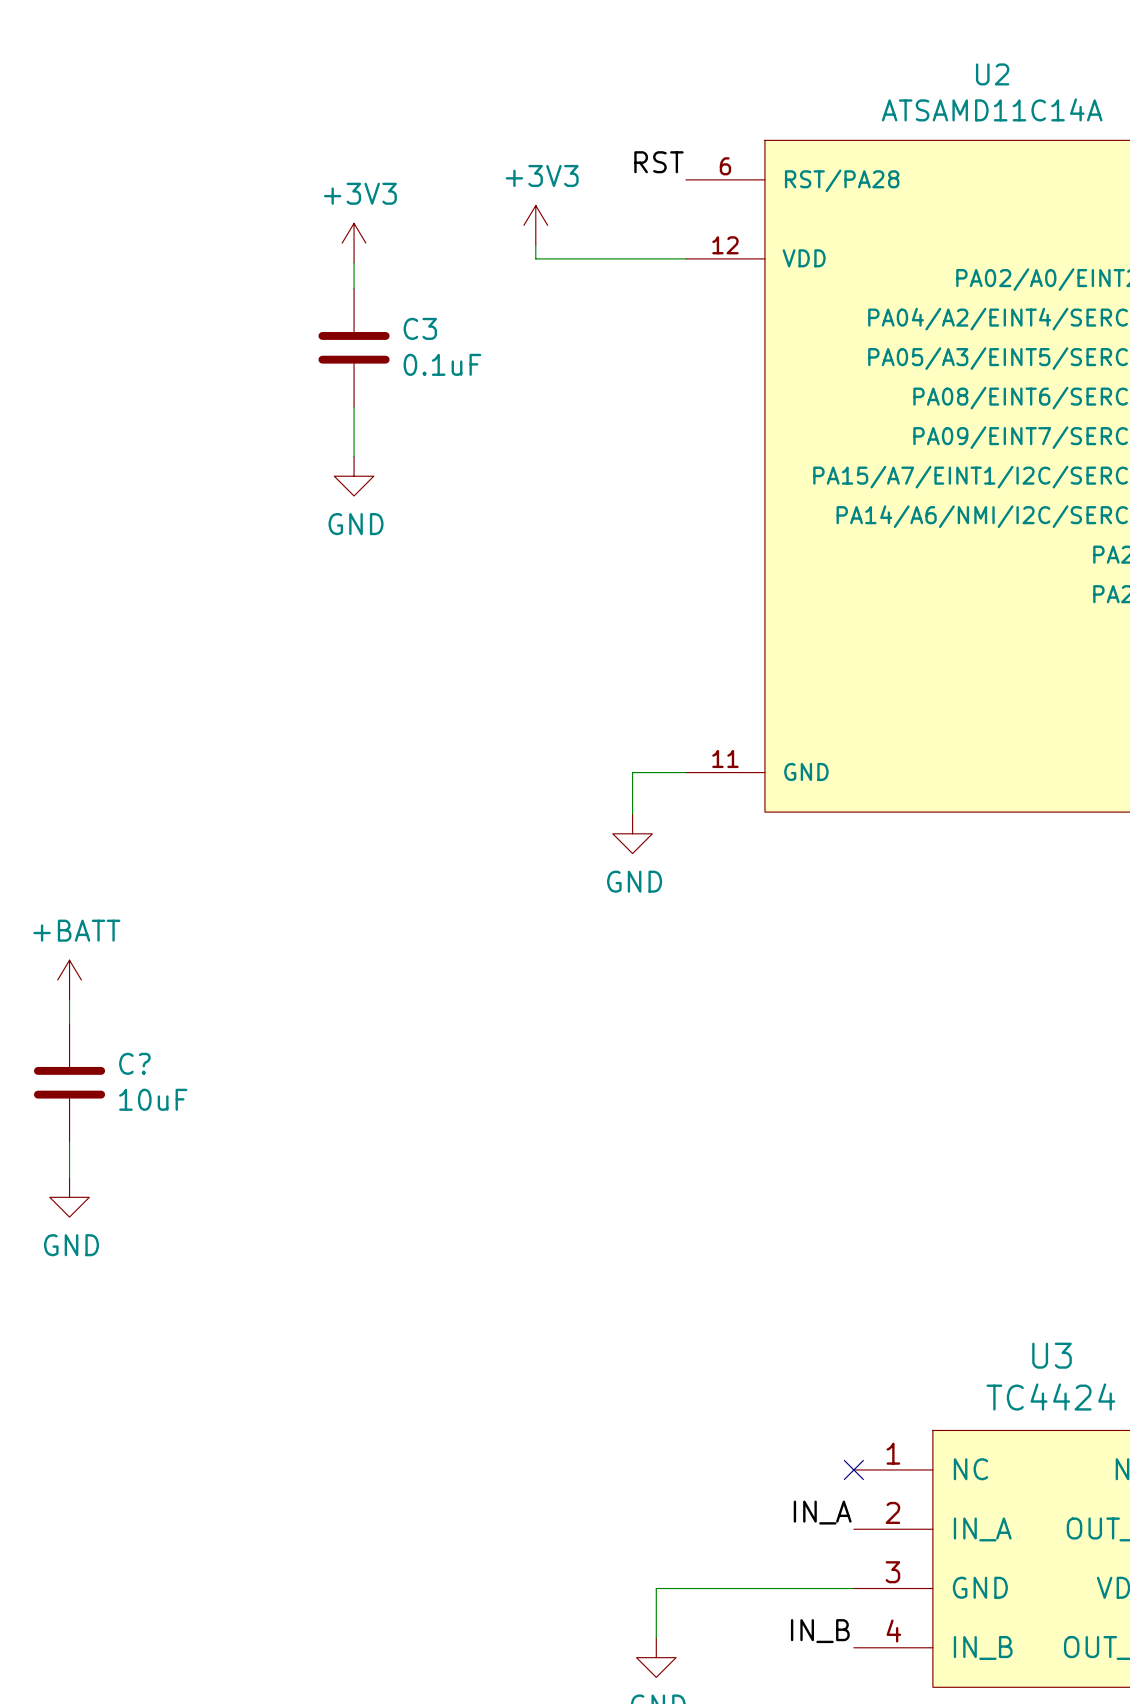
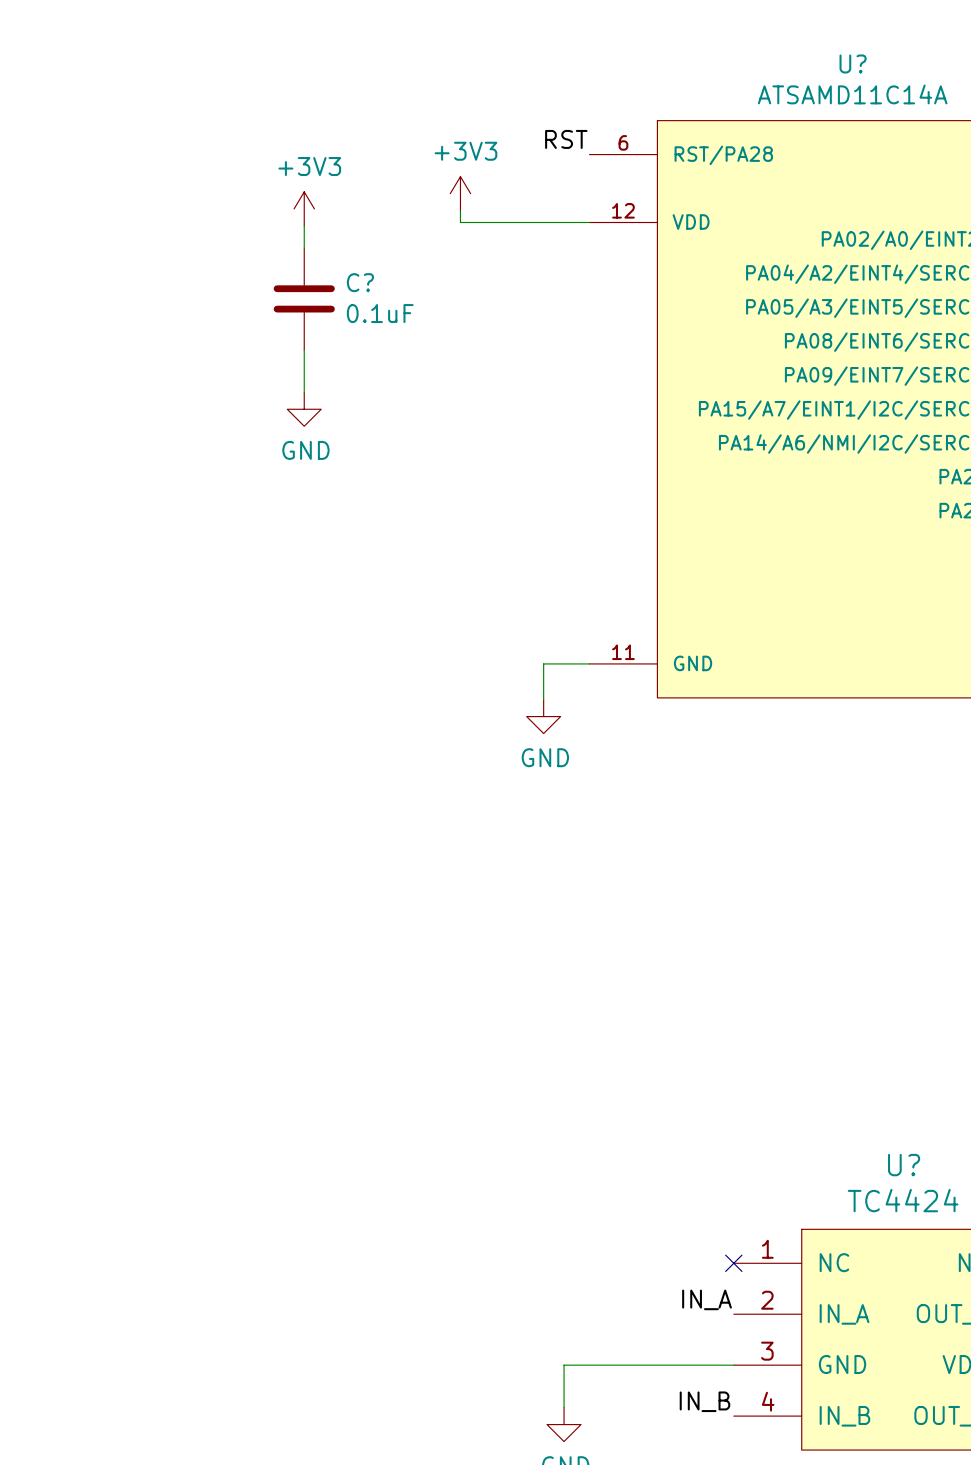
U2 name: U2 (992, 74) -> U? (853, 63)
C3 name: C3 (420, 328) -> C? (360, 282)
power symbol: +BATT (69, 980) -> none
wire: (69, 999) (69, 1023) -> none
C?: 10uF (69, 1082) -> none
wire: (69, 1142) (69, 1177) -> none
power symbol: GND (69, 1197) -> none
U3 name: U3 (1052, 1355) -> U? (904, 1165)

